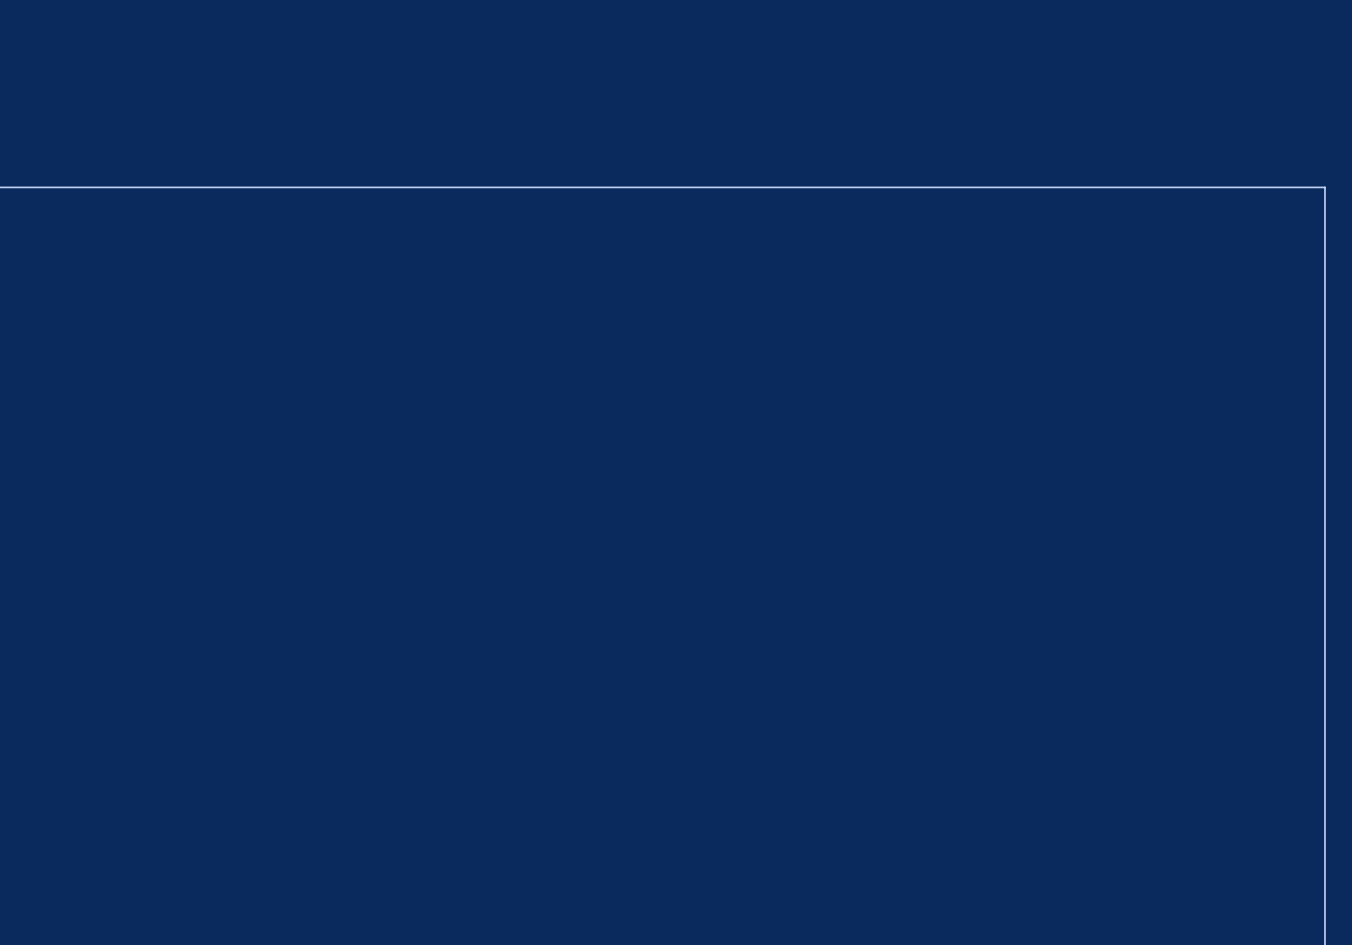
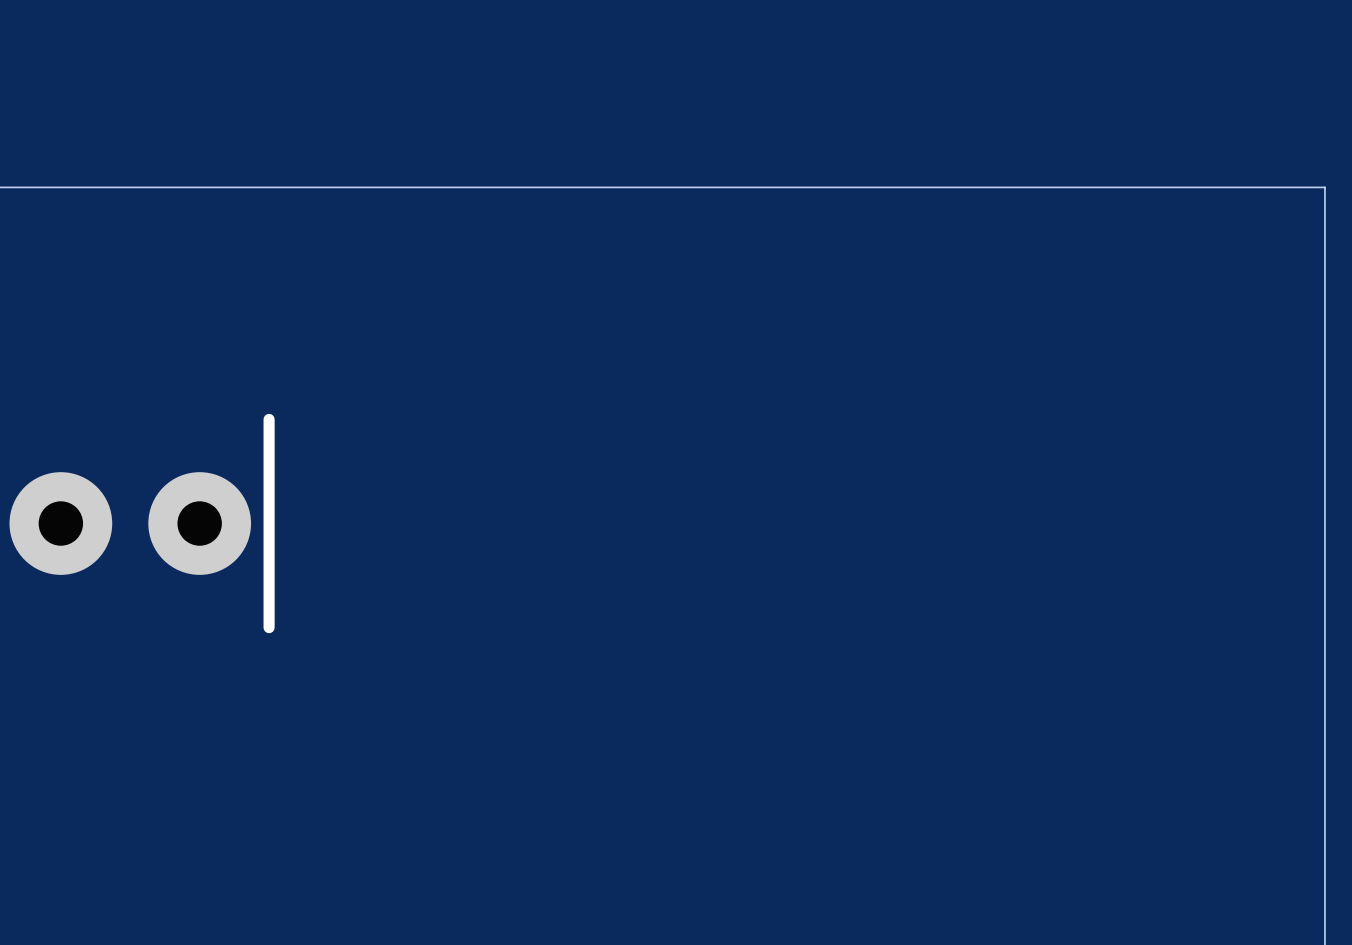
part: none -> (142, 523)

